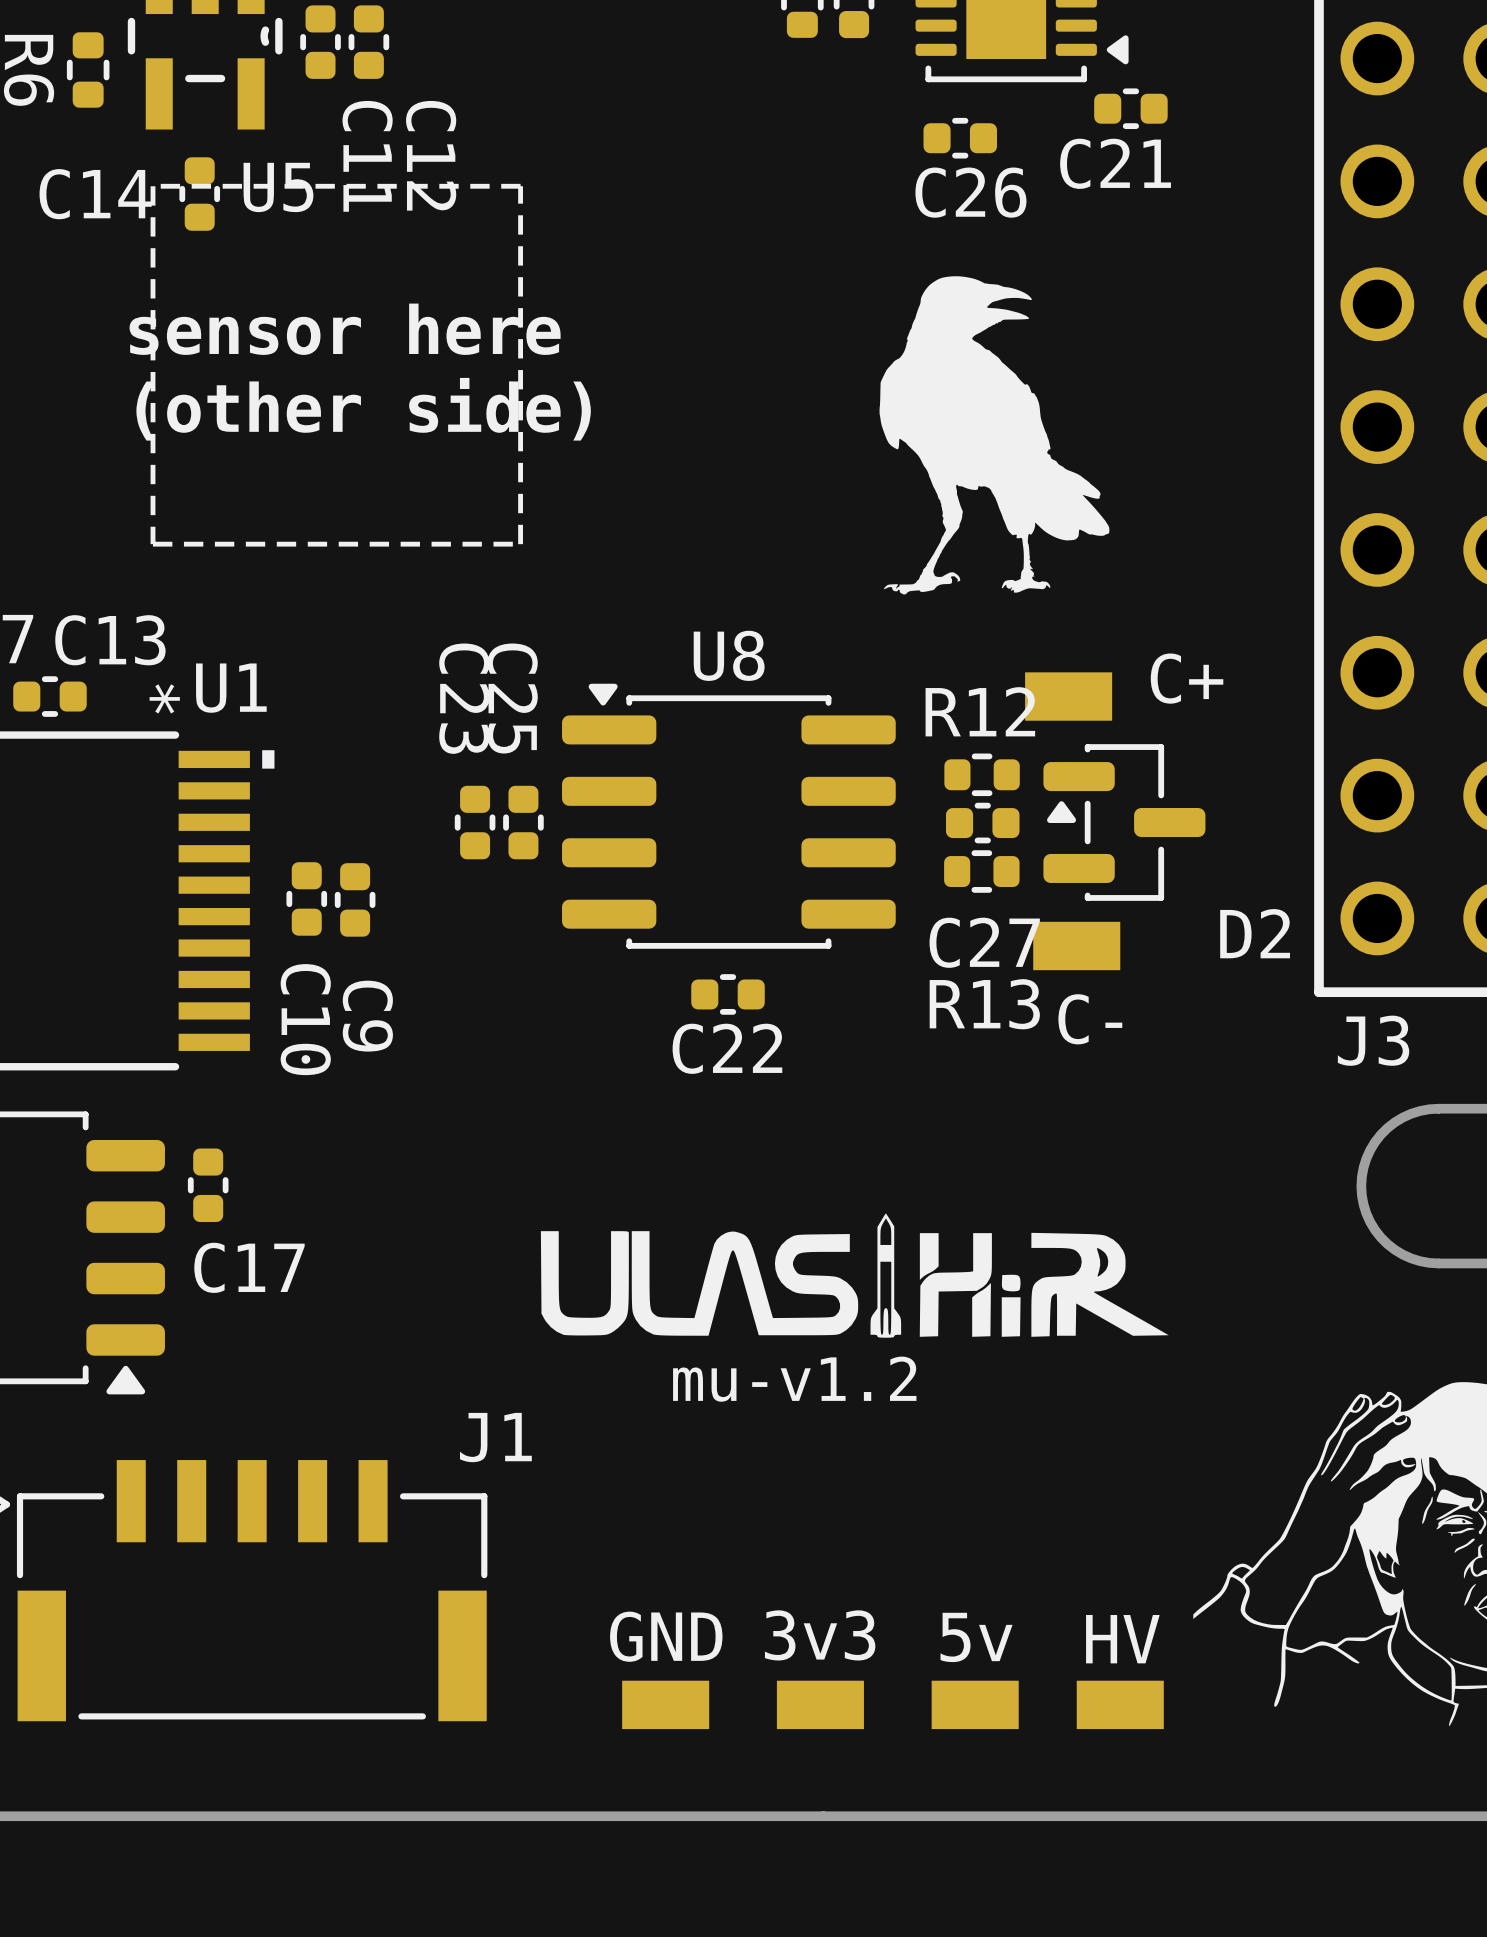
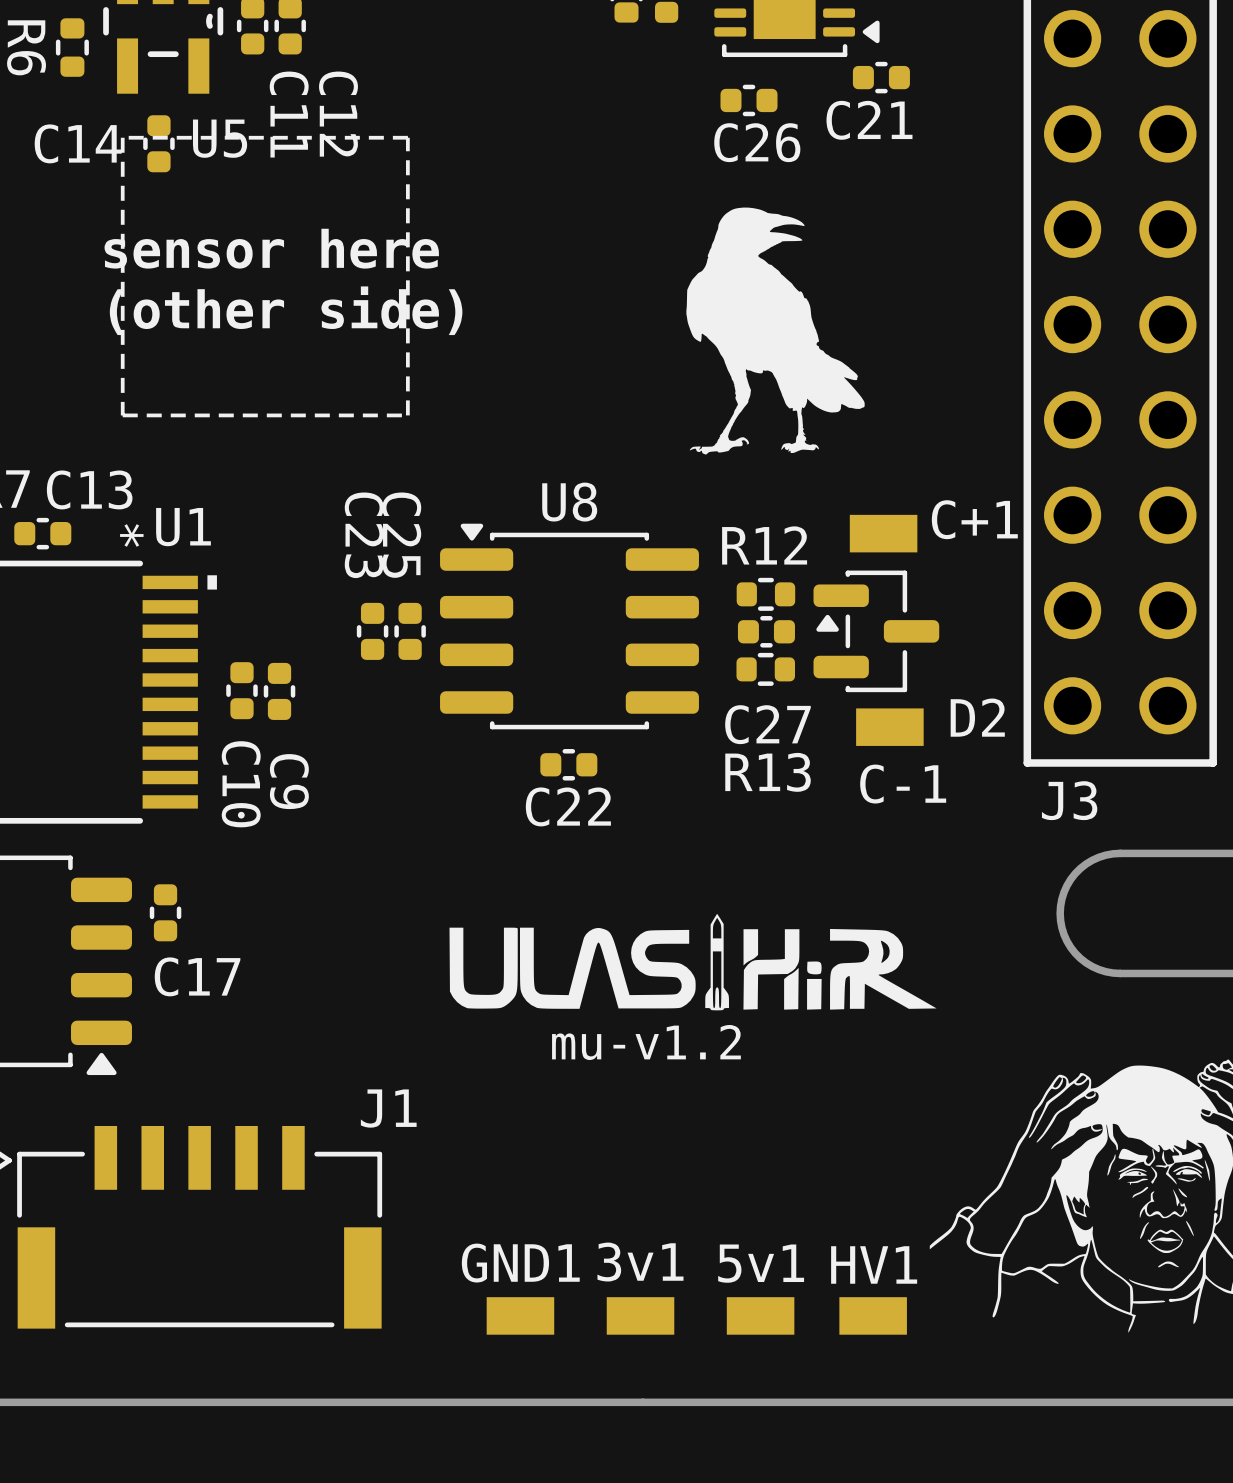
C+: (1068, 696) -> none
C+1: none -> (883, 533)
C-: (1076, 946) -> none
C-1: none -> (889, 727)
drawing position: (854, 1275) -> (693, 962)
text position: mu-v1.2 (794, 1379) -> mu-v1.2 (646, 1042)
3v3 name: 3v3 (820, 1635) -> 3v1 (640, 1262)
GND name: GND (666, 1636) -> GND1 (520, 1263)
5v name: 5v (976, 1637) -> 5v1 (761, 1263)
HV name: HV (1122, 1639) -> HV1 (874, 1264)

